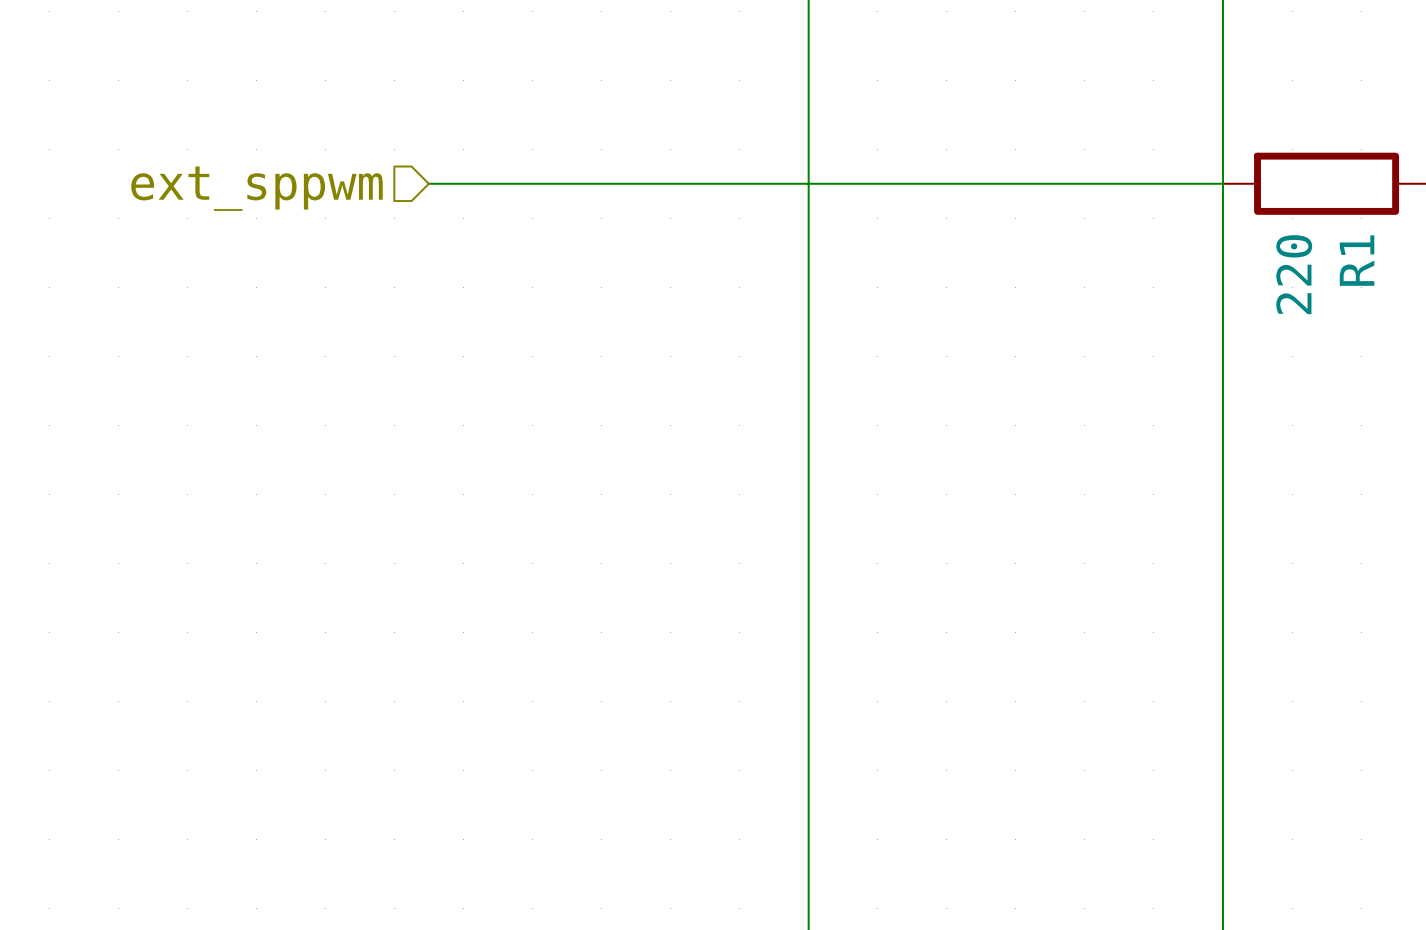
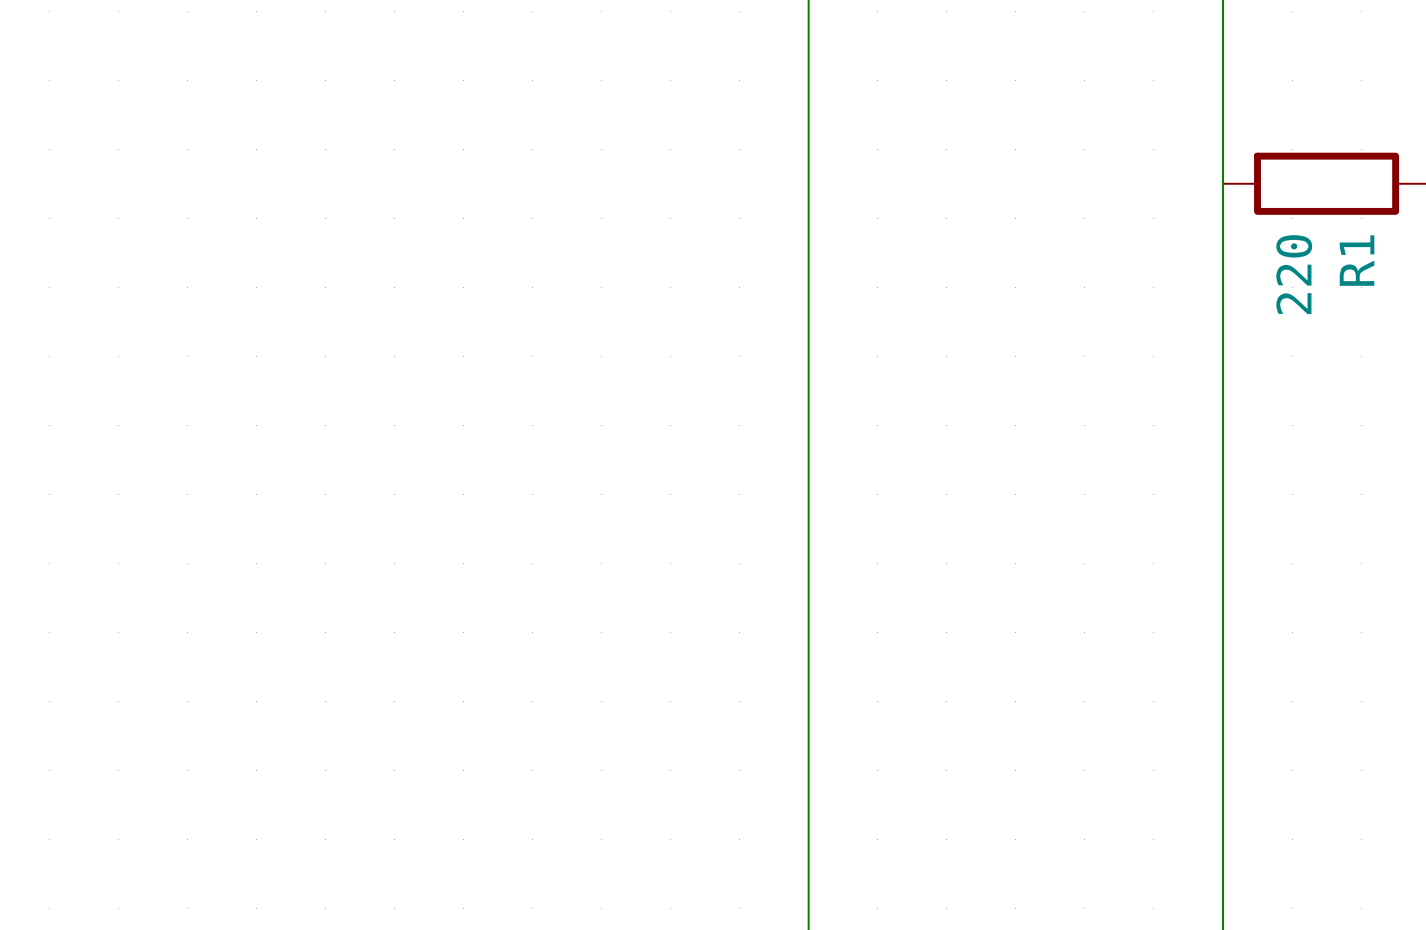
wire: (428, 183) (1222, 183) -> none
hierarchical label: ext_sppwm (256, 188) -> none

